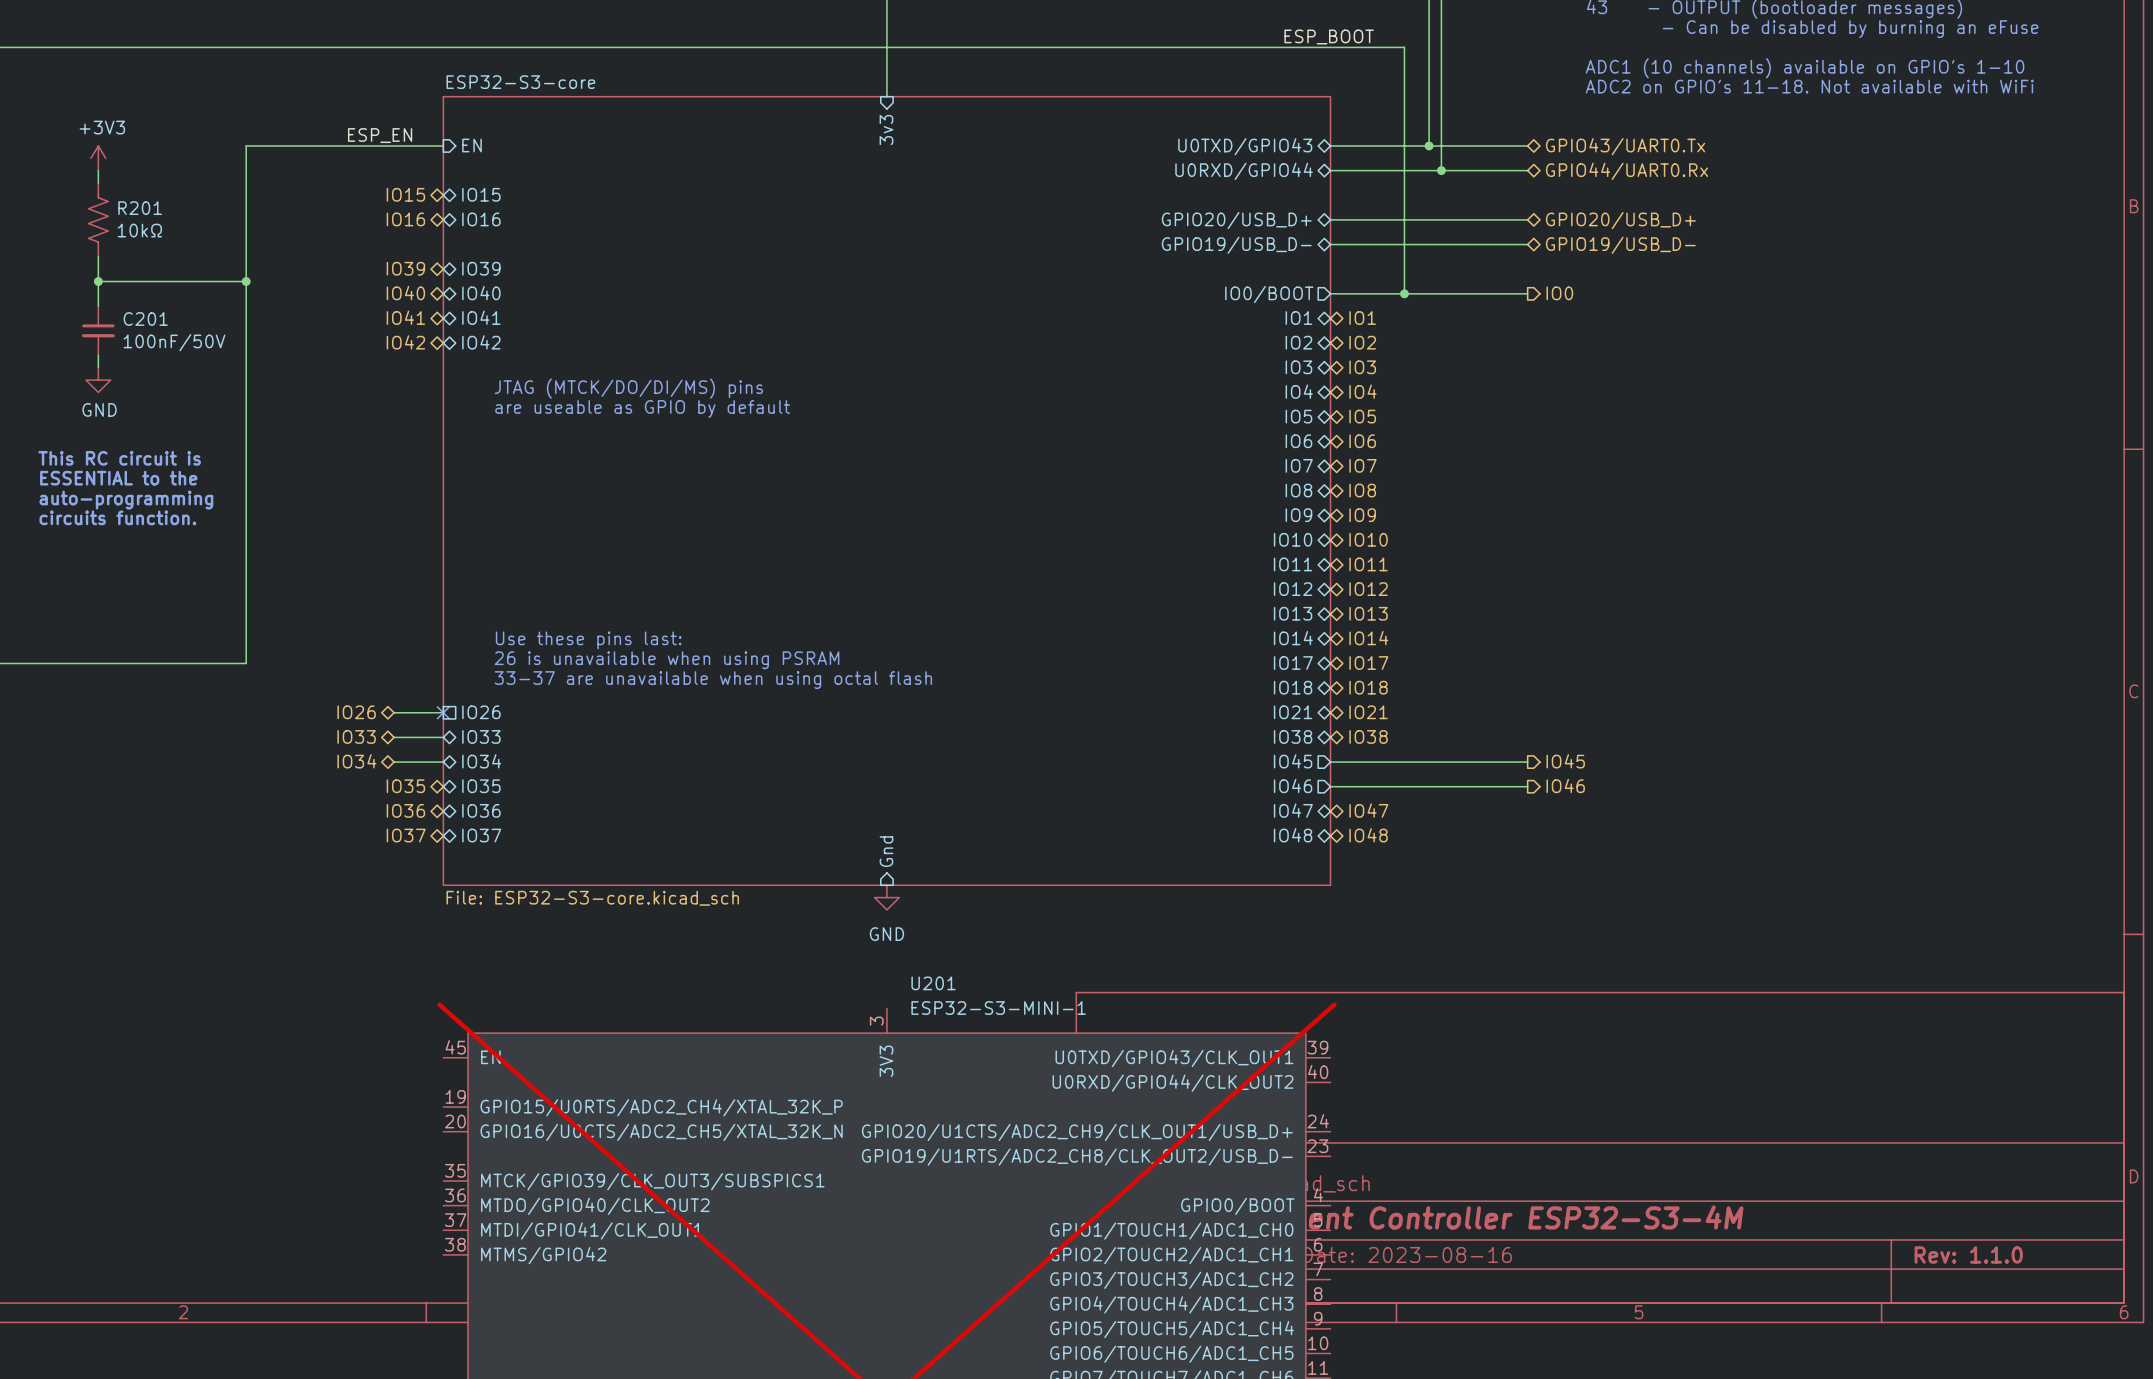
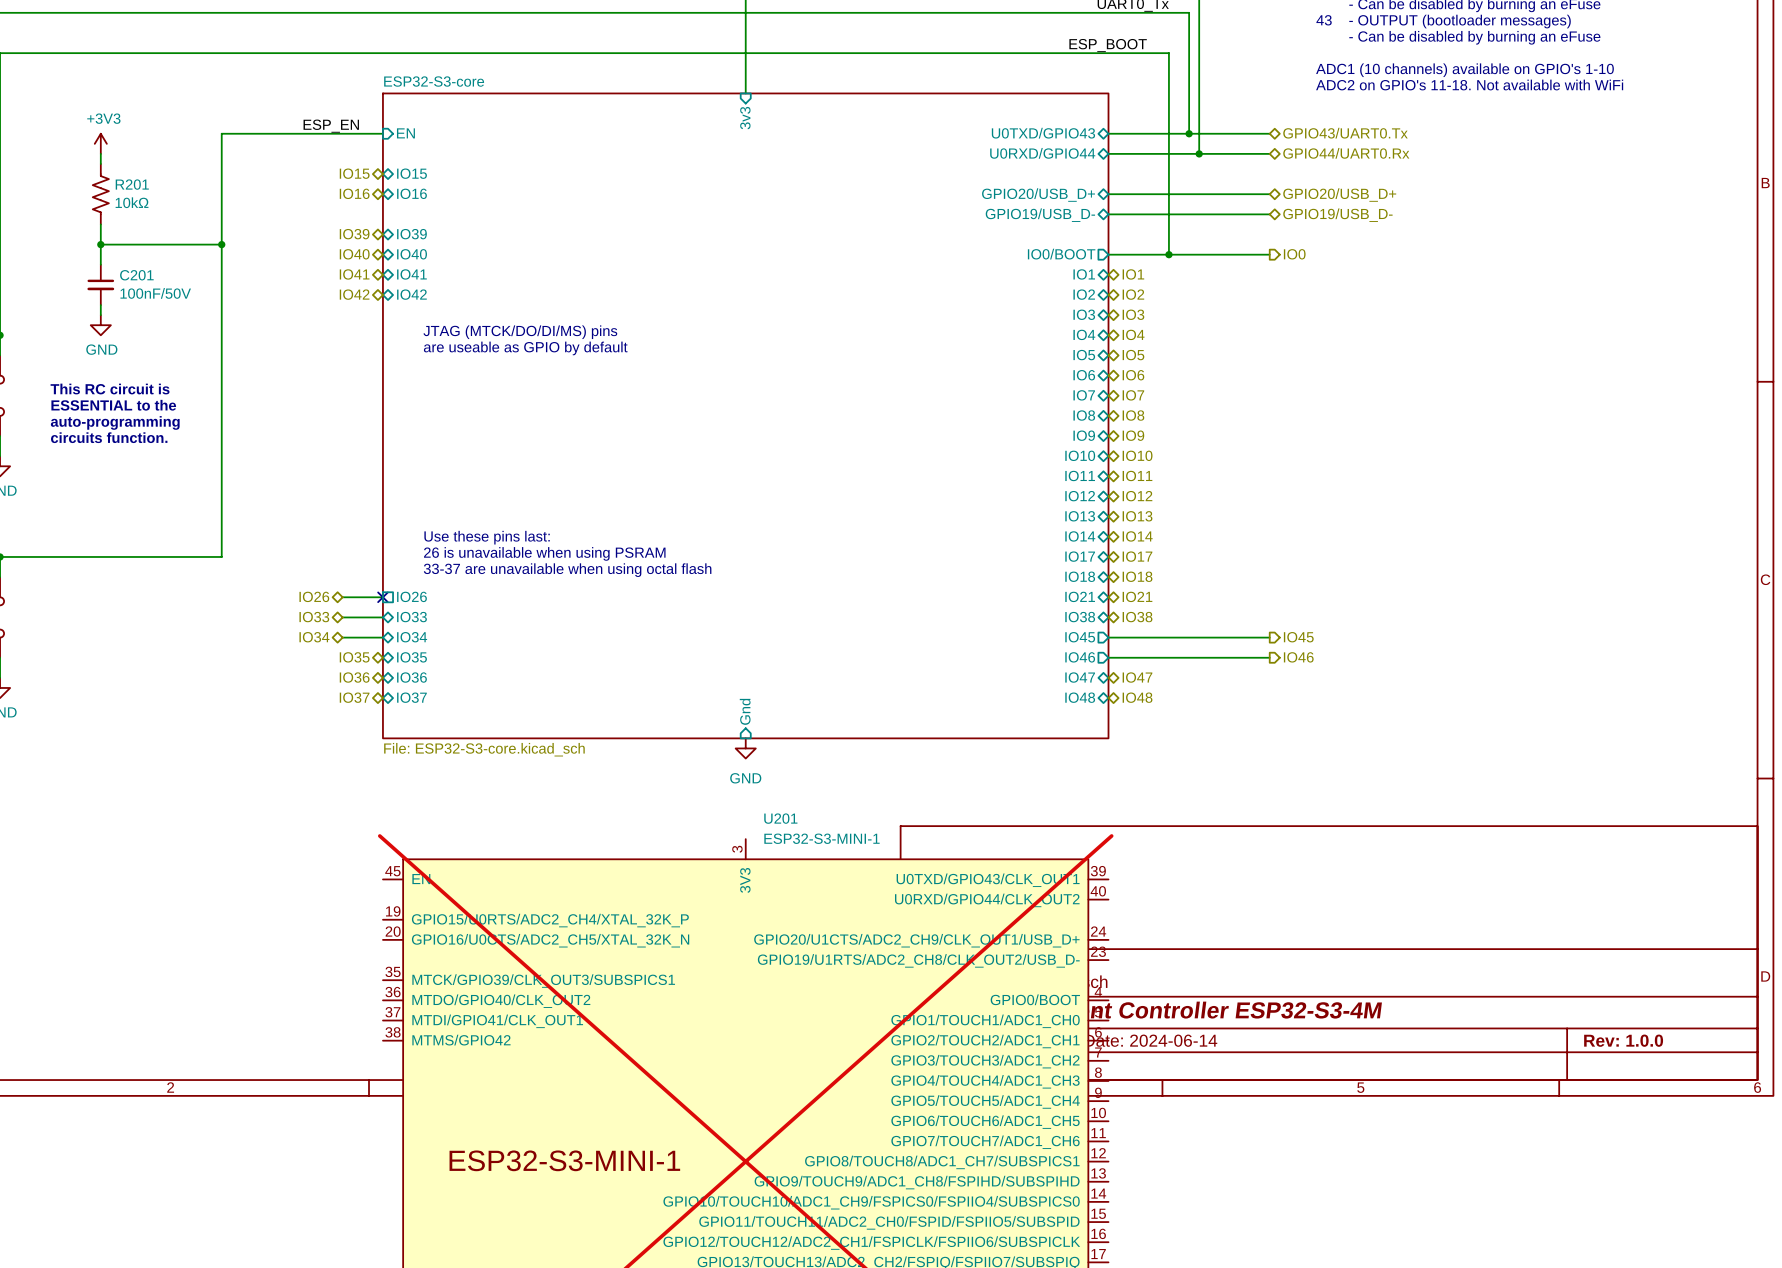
title block: Date: 2023-08-16 (1407, 1254) -> Date: 2024-06-14 (1150, 1040)
title block: Rev: 1.1.0 (1968, 1254) -> Rev: 1.0.0 (1623, 1040)

